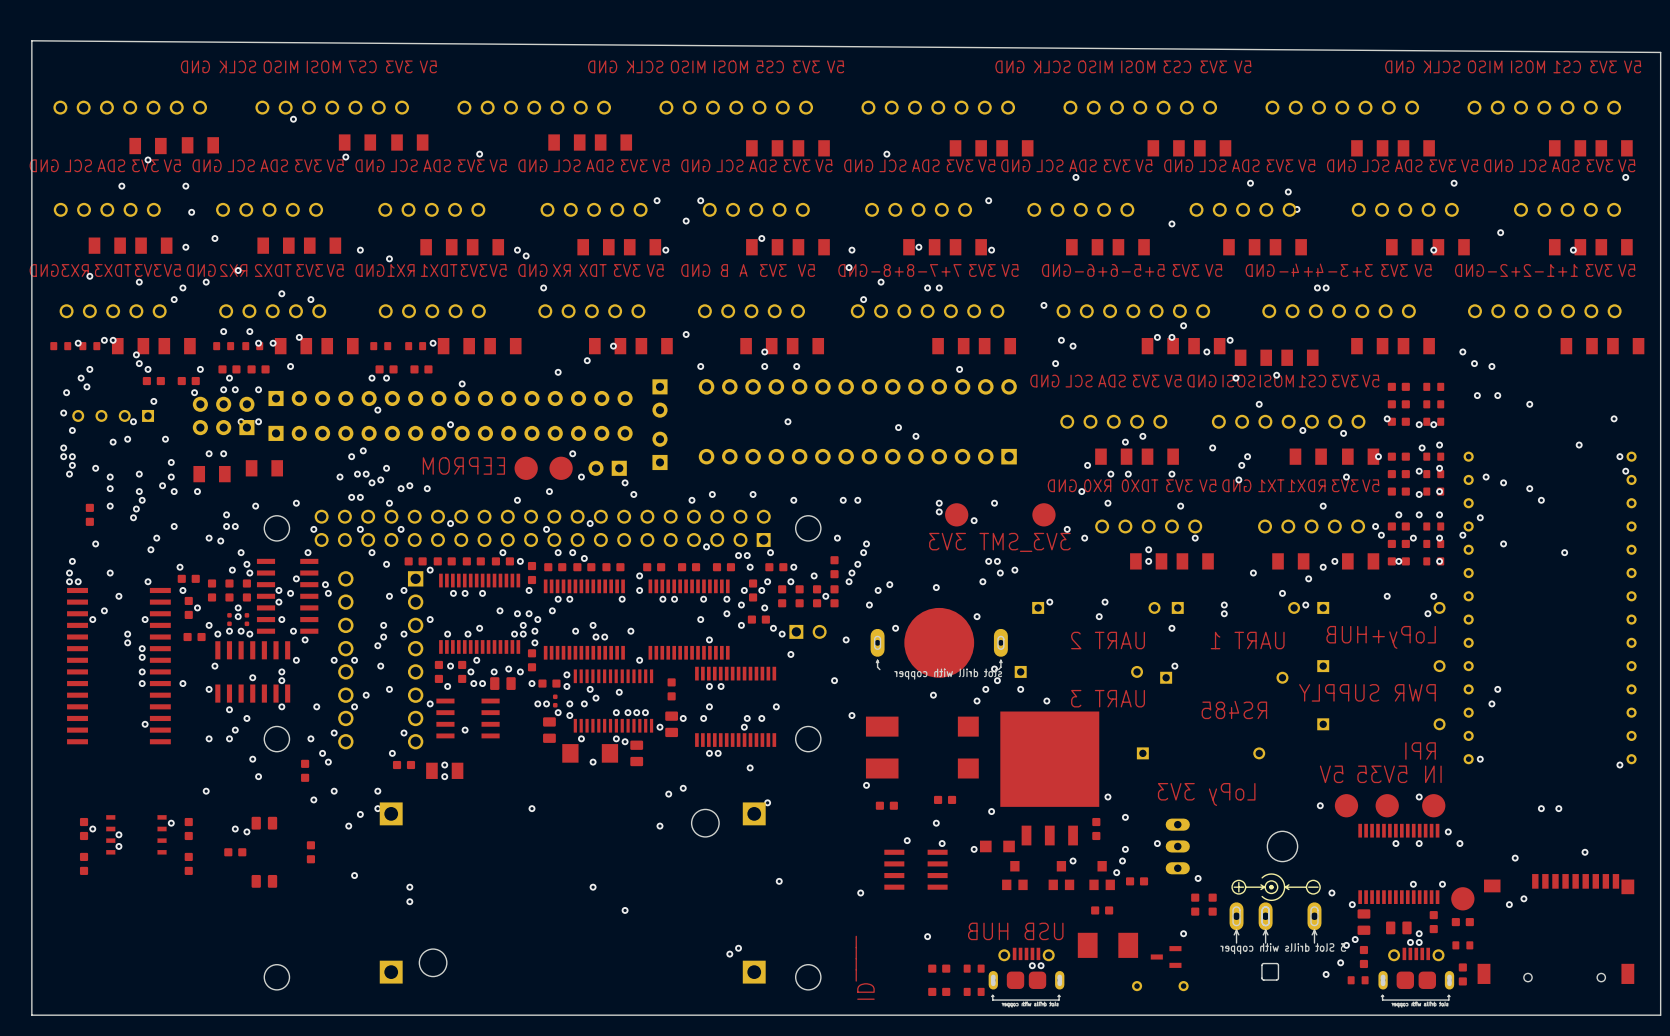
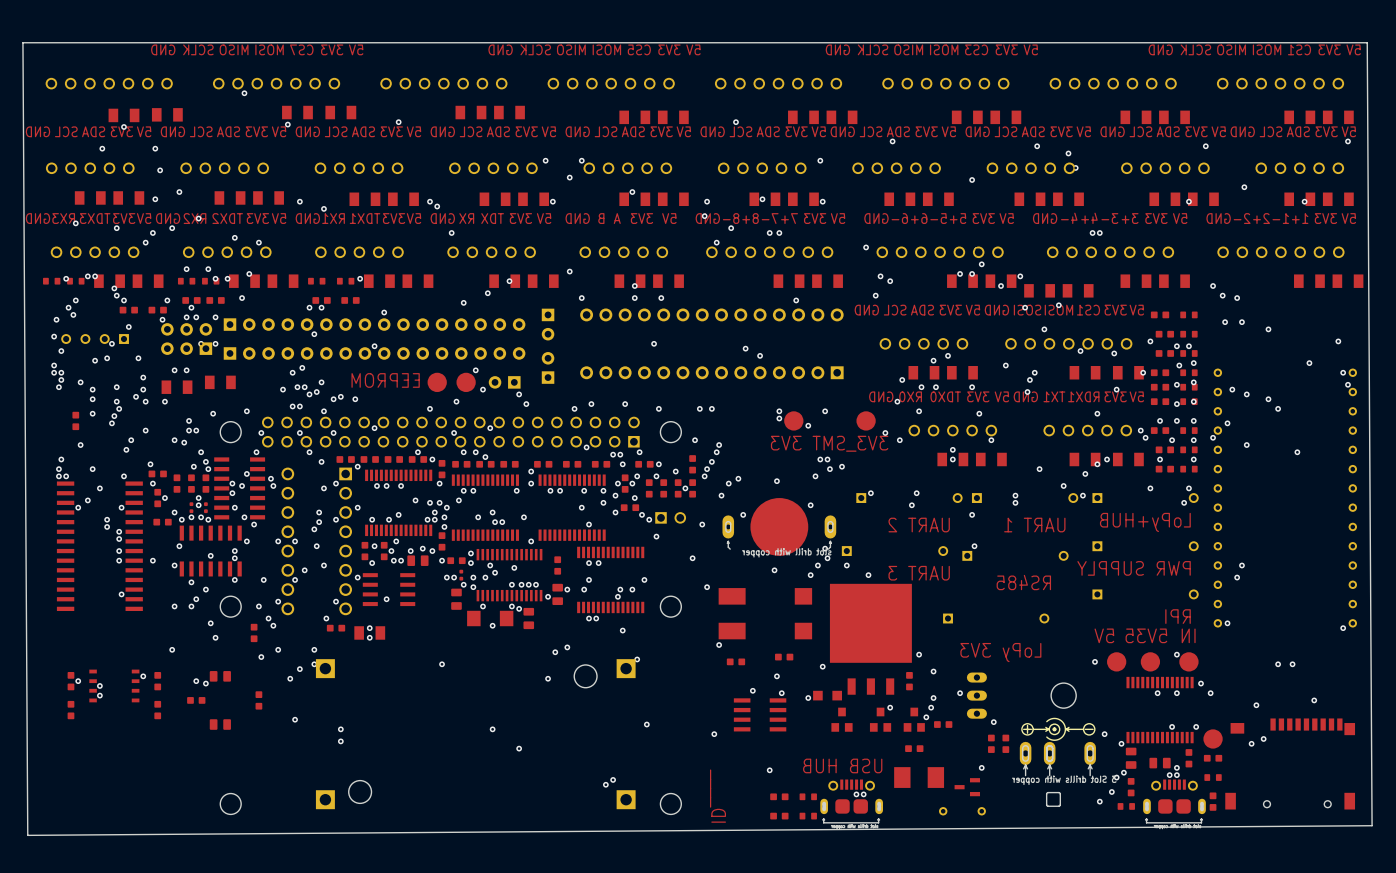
board edge: (31, 40) (31, 1015) (1660, 1015) (1660, 52) (31, 40) -> (1367, 42) (1372, 825) (27, 835) (22, 42) (1367, 42)
part: (1398, 404) -> none
part: (1433, 404) -> none
part: none -> (1164, 334)
part: none -> (1188, 334)
part: (1398, 421) -> none
part: (1433, 421) -> none
part: none -> (1164, 353)
part: none -> (1188, 353)
part: (1398, 543) -> none
part: (1433, 543) -> none
part: none -> (1164, 449)
part: none -> (1188, 449)
part position: (1290, 561) -> (1085, 459)
part: (1398, 561) -> none
part: (1433, 561) -> none
part: none -> (1164, 469)
part: none -> (1188, 469)

